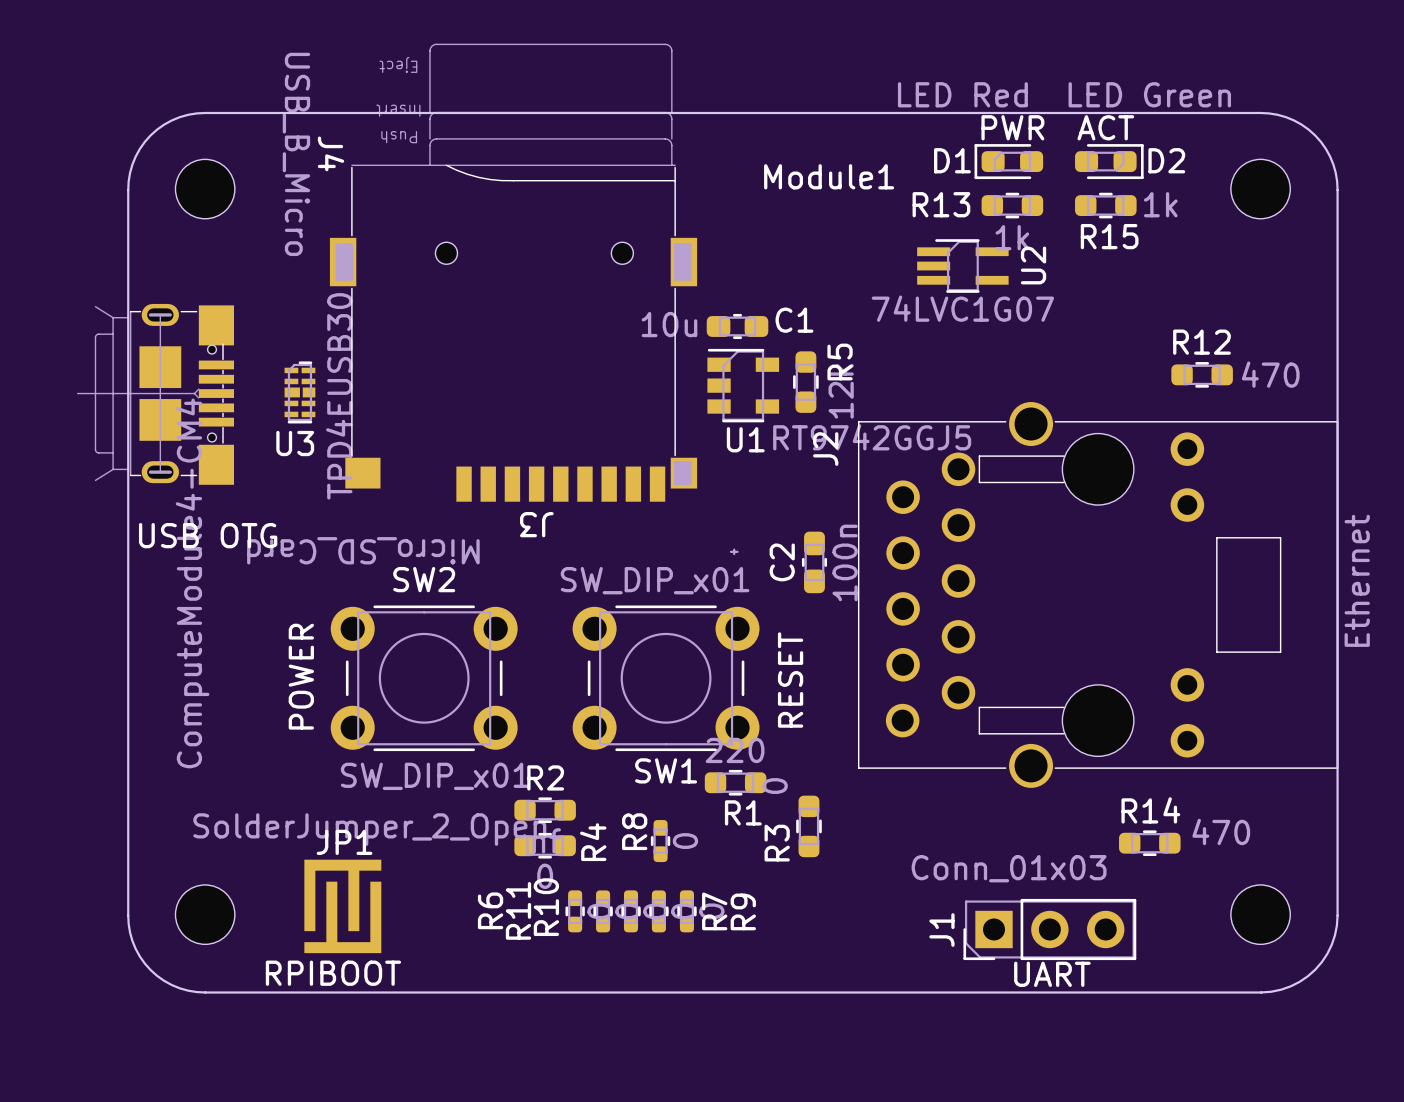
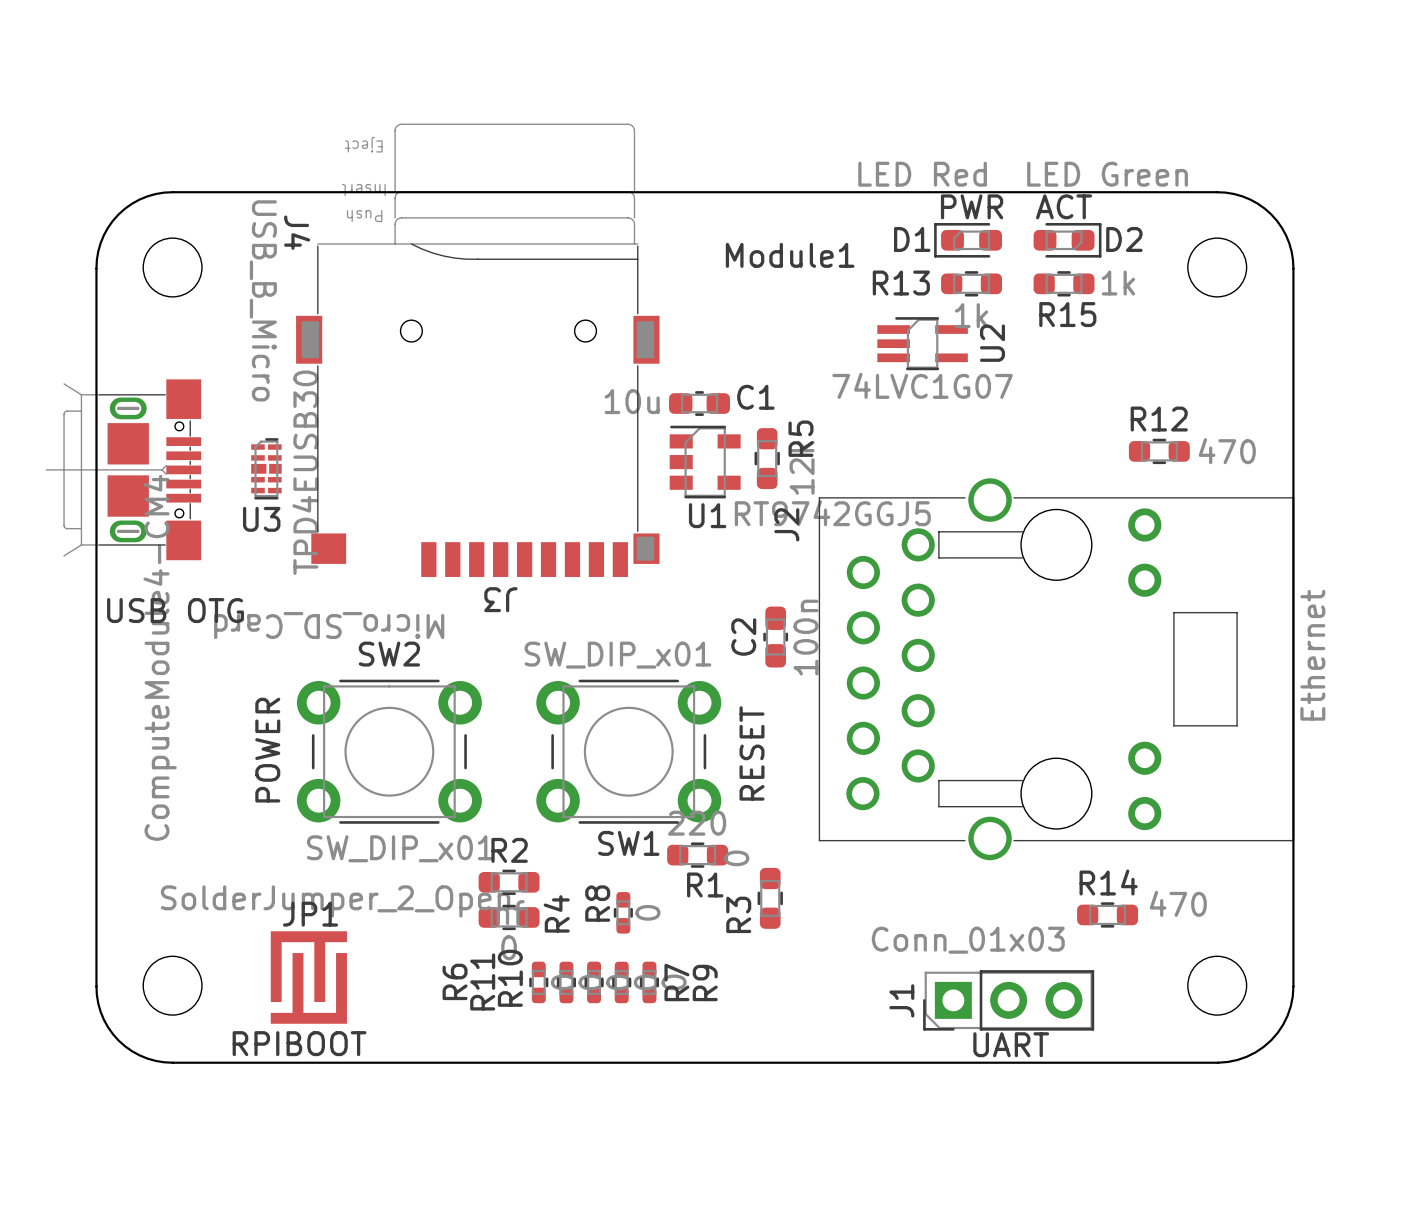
J4 value position: USB_B_Micro (296, 154) -> USB_B_Micro (263, 300)
J4 footprint: [77, 303, 235, 485] -> [46, 379, 202, 561]
line: (734, 549) (734, 554) -> none
line: (730, 551) (737, 551) -> none

